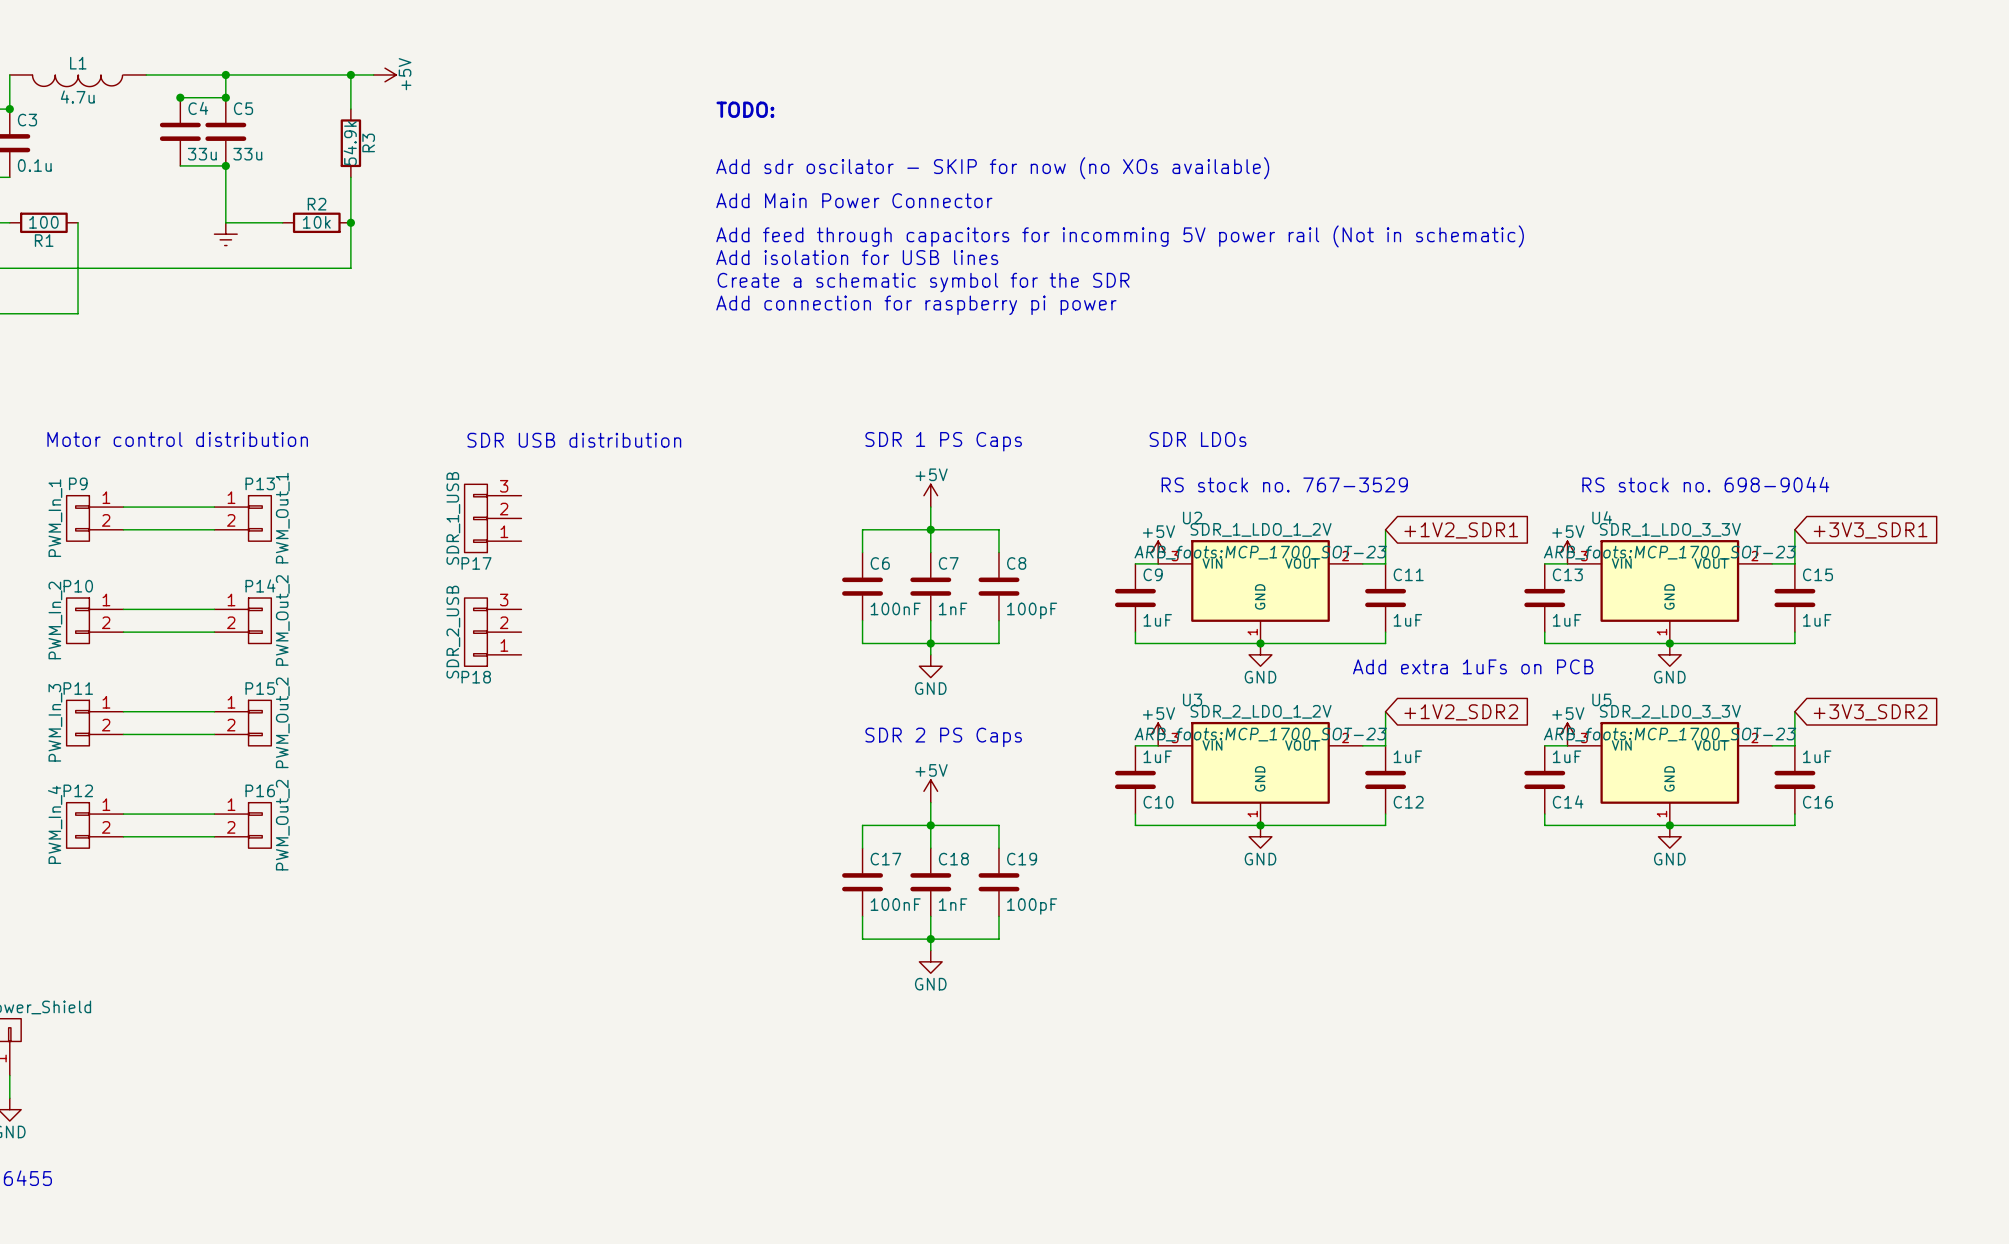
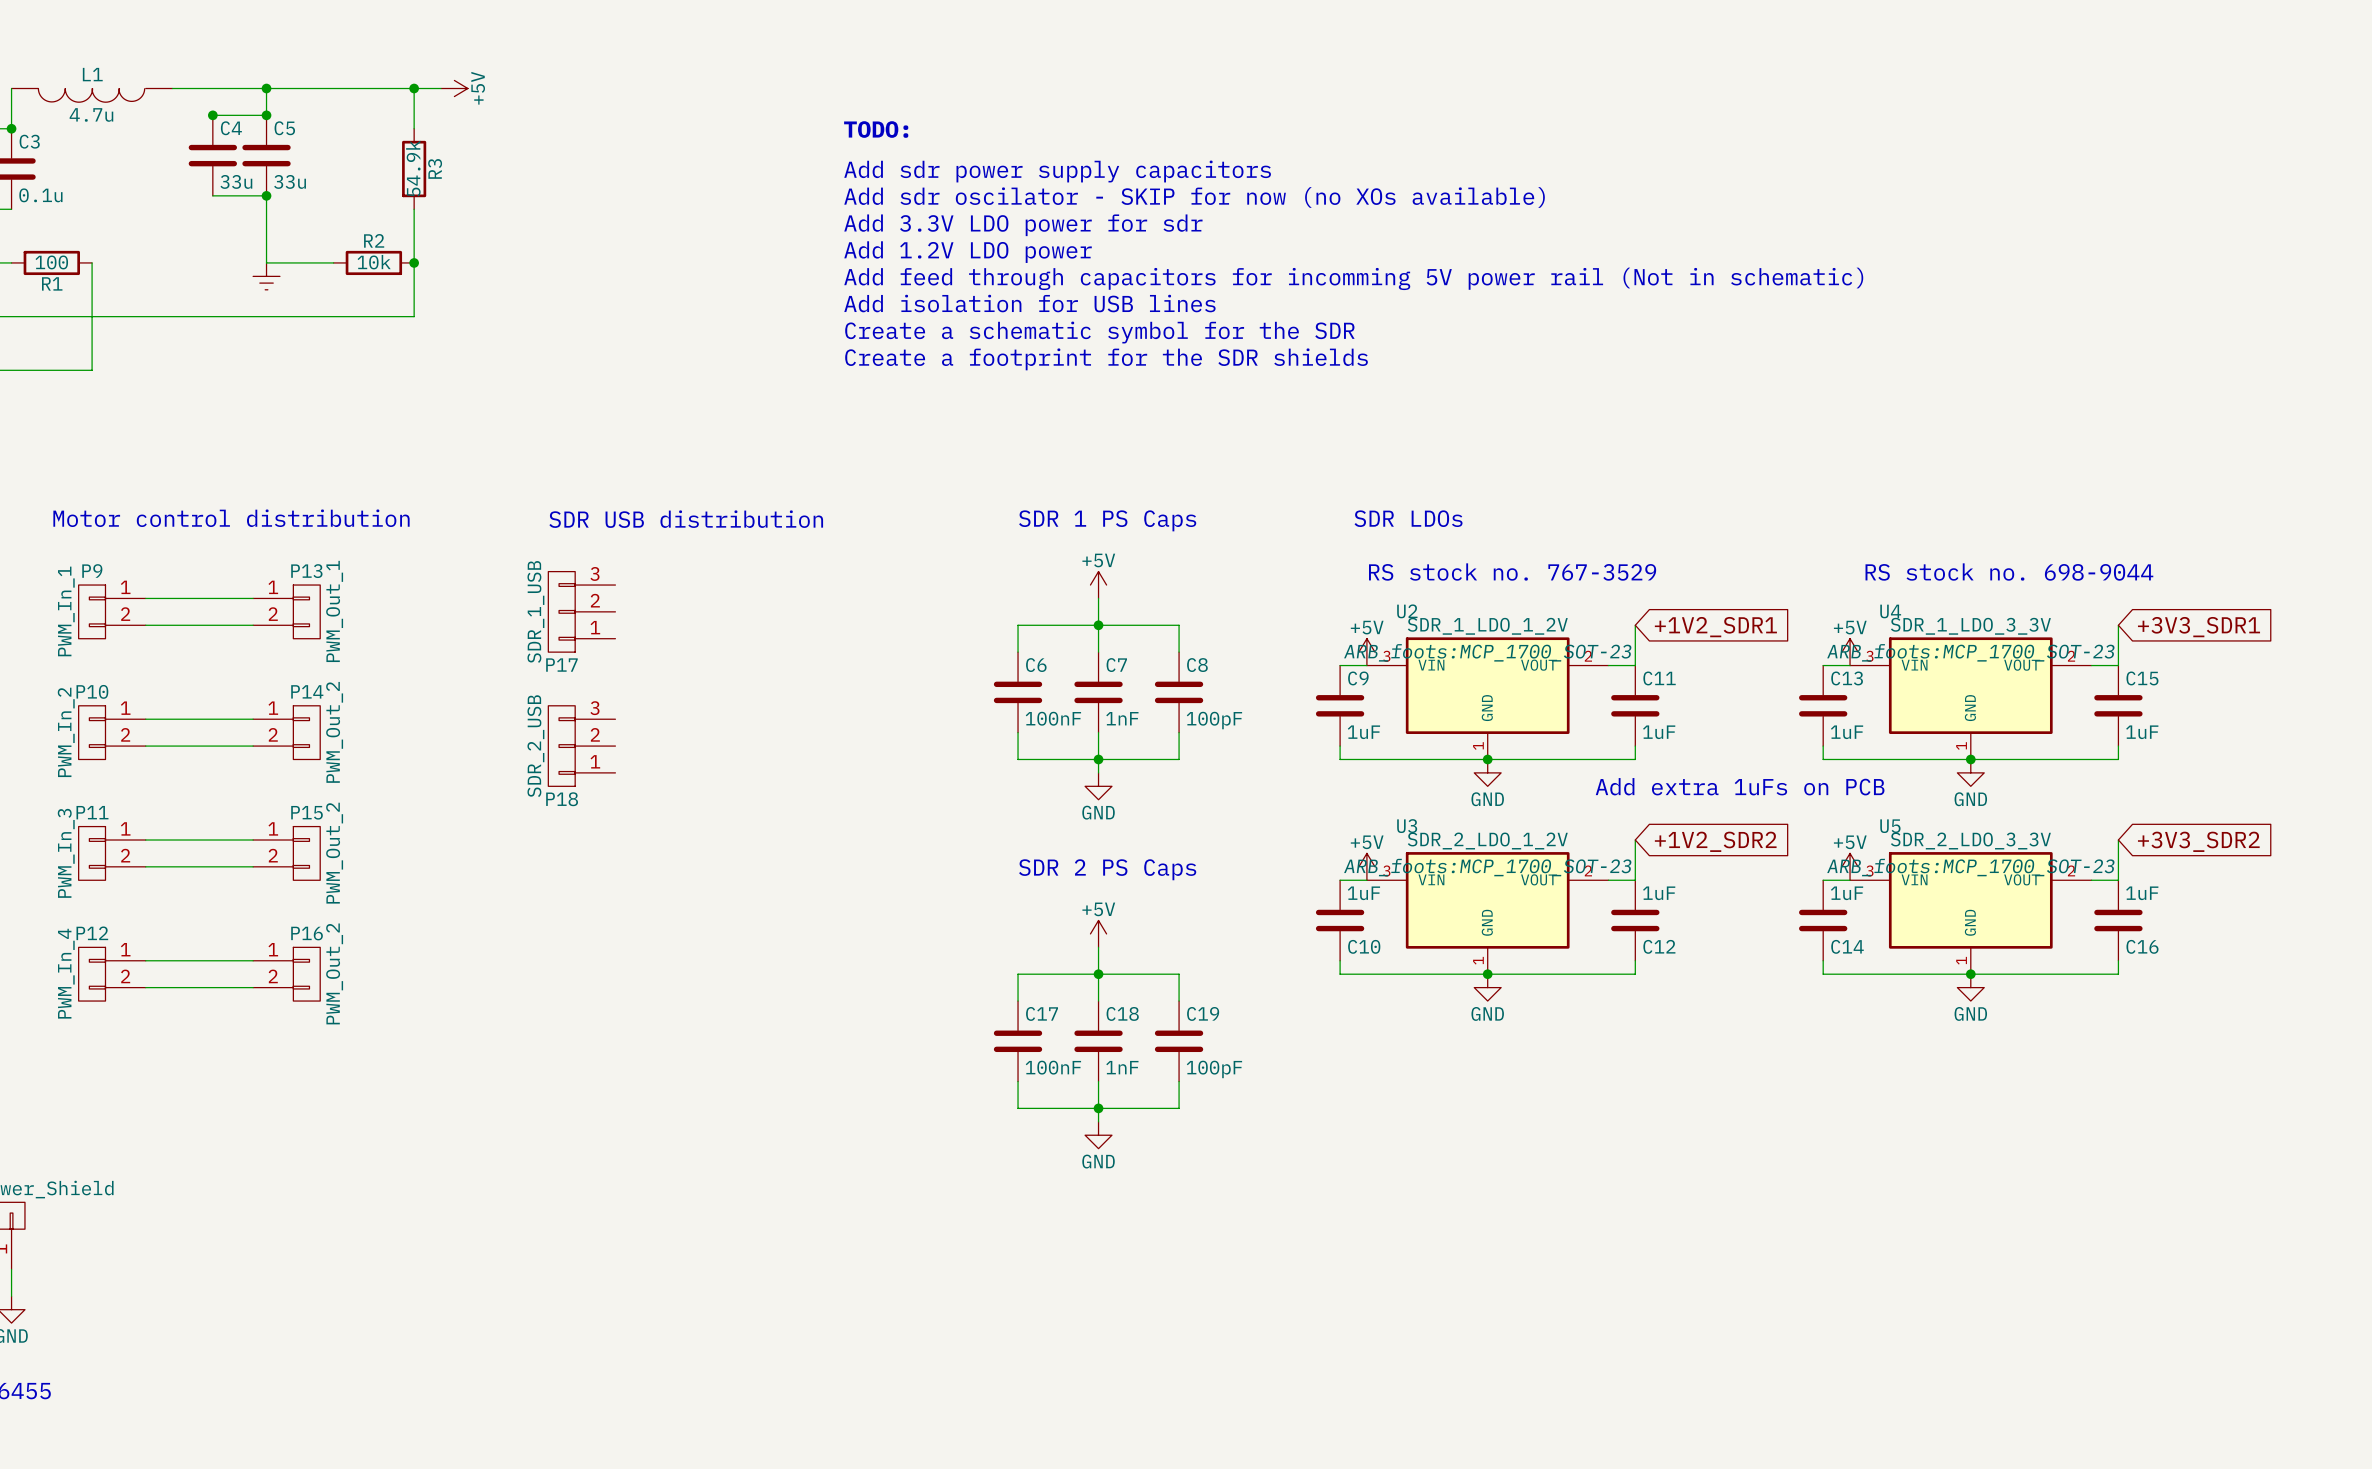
text: none -> Add sdr power supply capacitors (1057, 171)
text: none -> Add 3.3V LDO power for sdr (1023, 225)
text: Add Main Power Connector (854, 200) -> none
text: none -> Add 1.2V LDO power (968, 252)
text: Add connection for raspberry pi power (916, 305) -> Create a footprint for the SDR shields (1106, 359)

